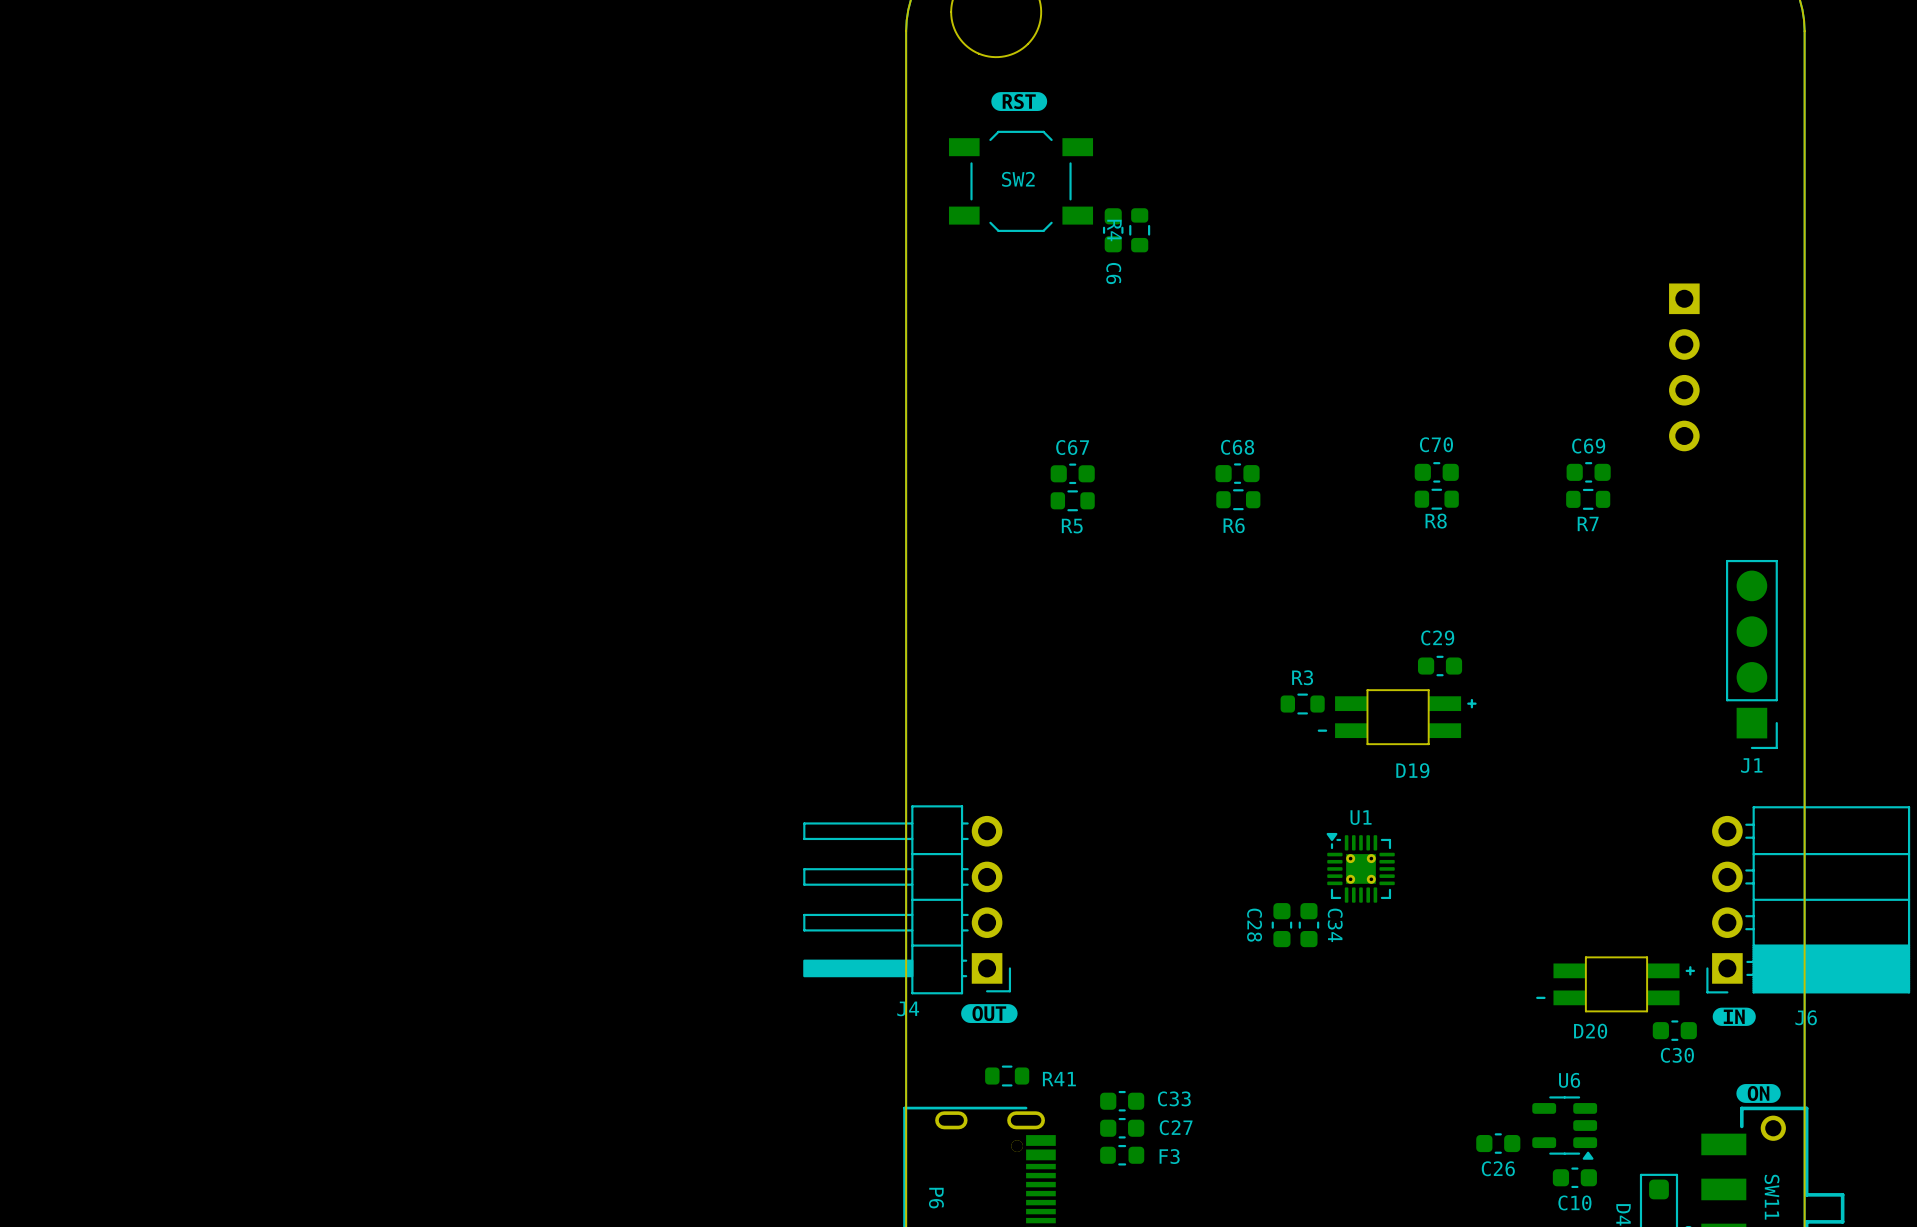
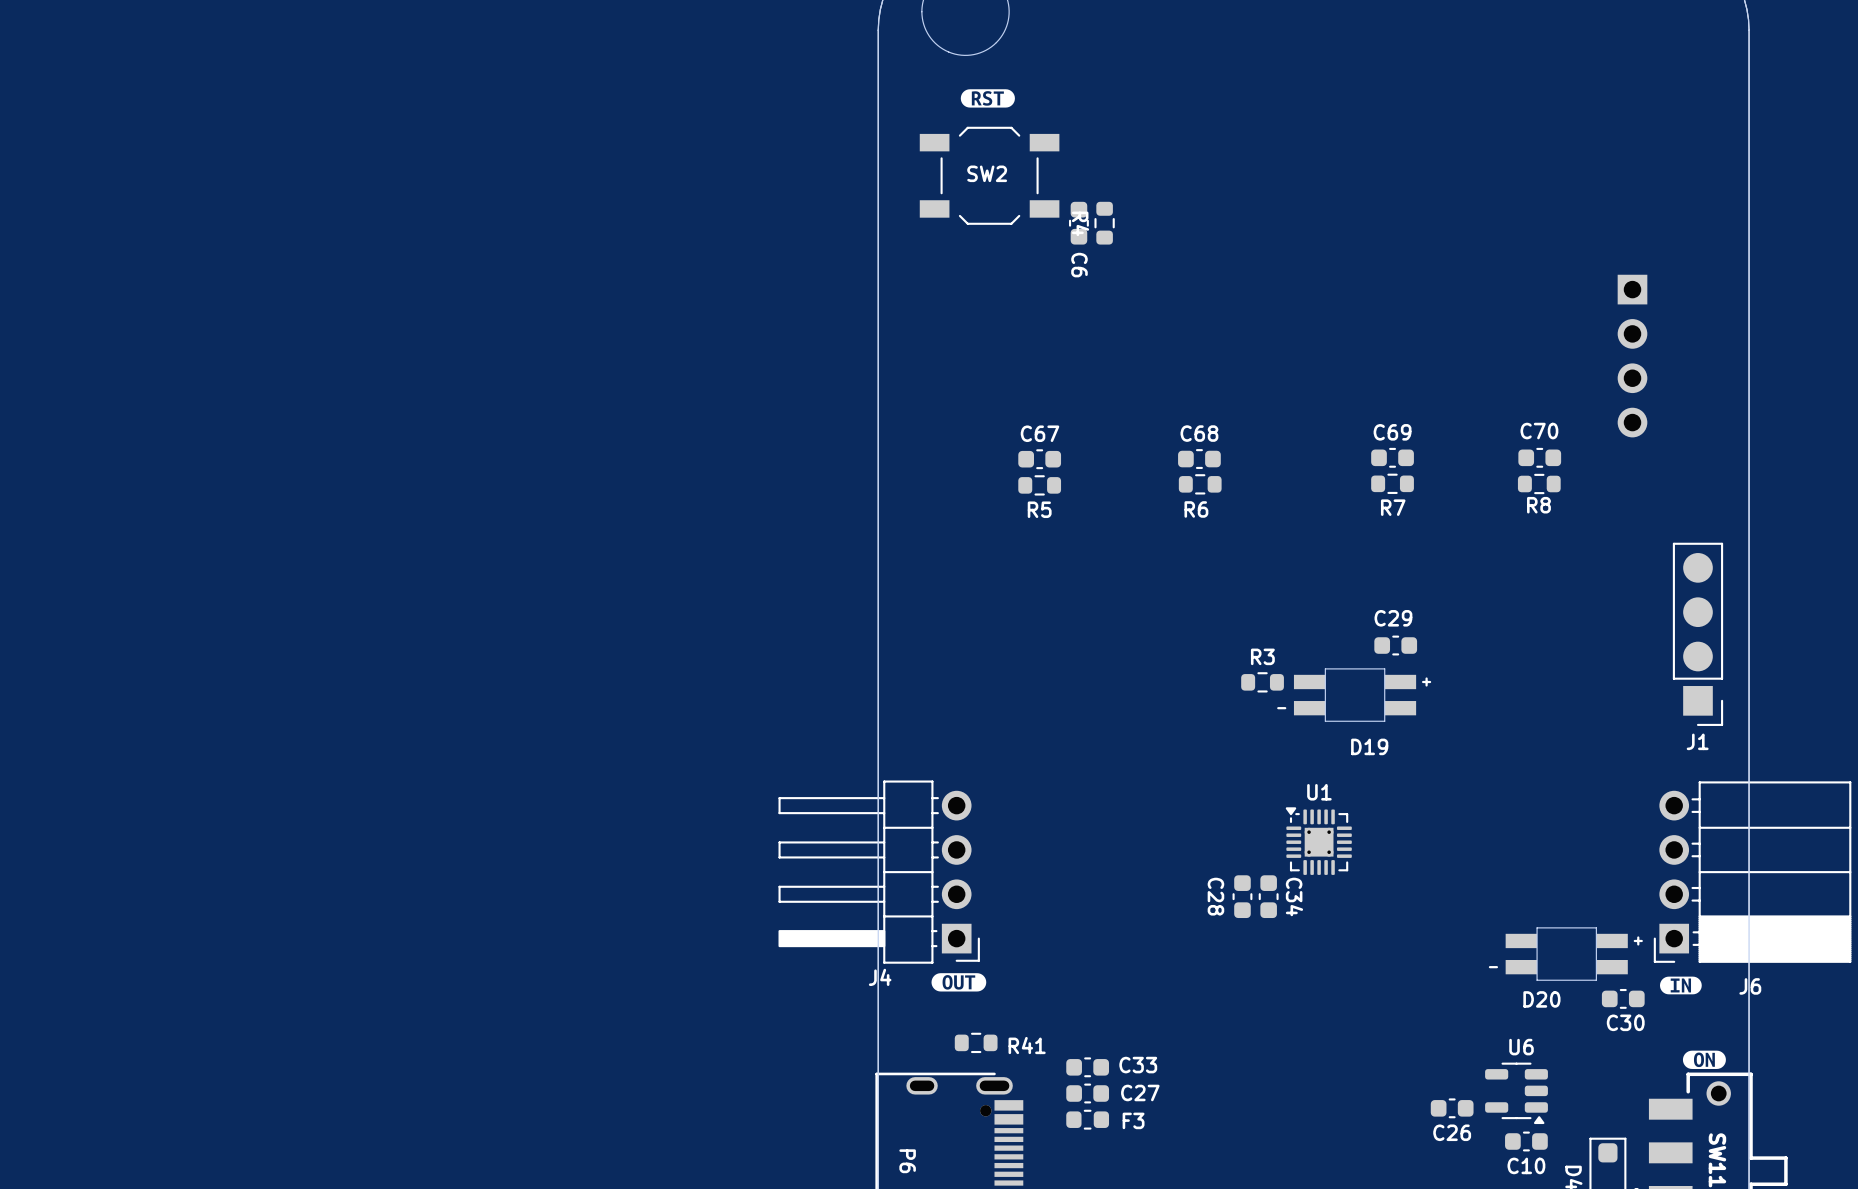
C70 name: C70 (1436, 444) -> C69 (1392, 432)
C69 name: C69 (1588, 446) -> C70 (1539, 431)
R8 name: R8 (1436, 521) -> R7 (1393, 507)
R7 name: R7 (1588, 523) -> R8 (1538, 505)

